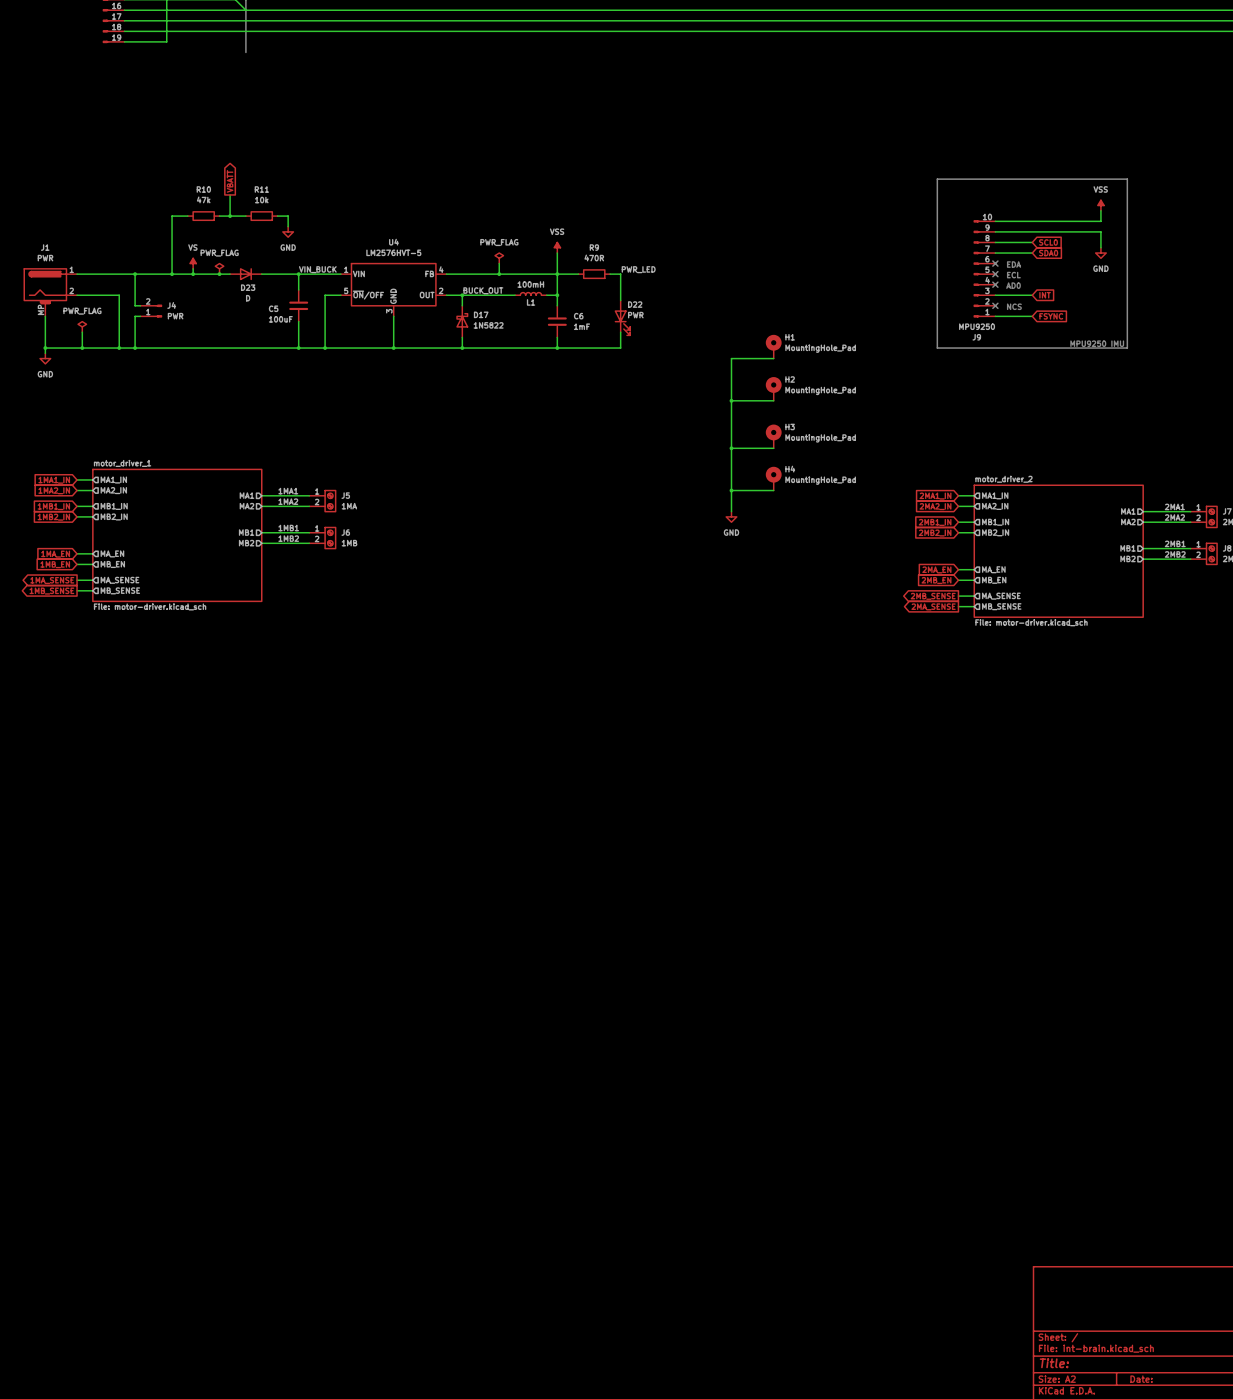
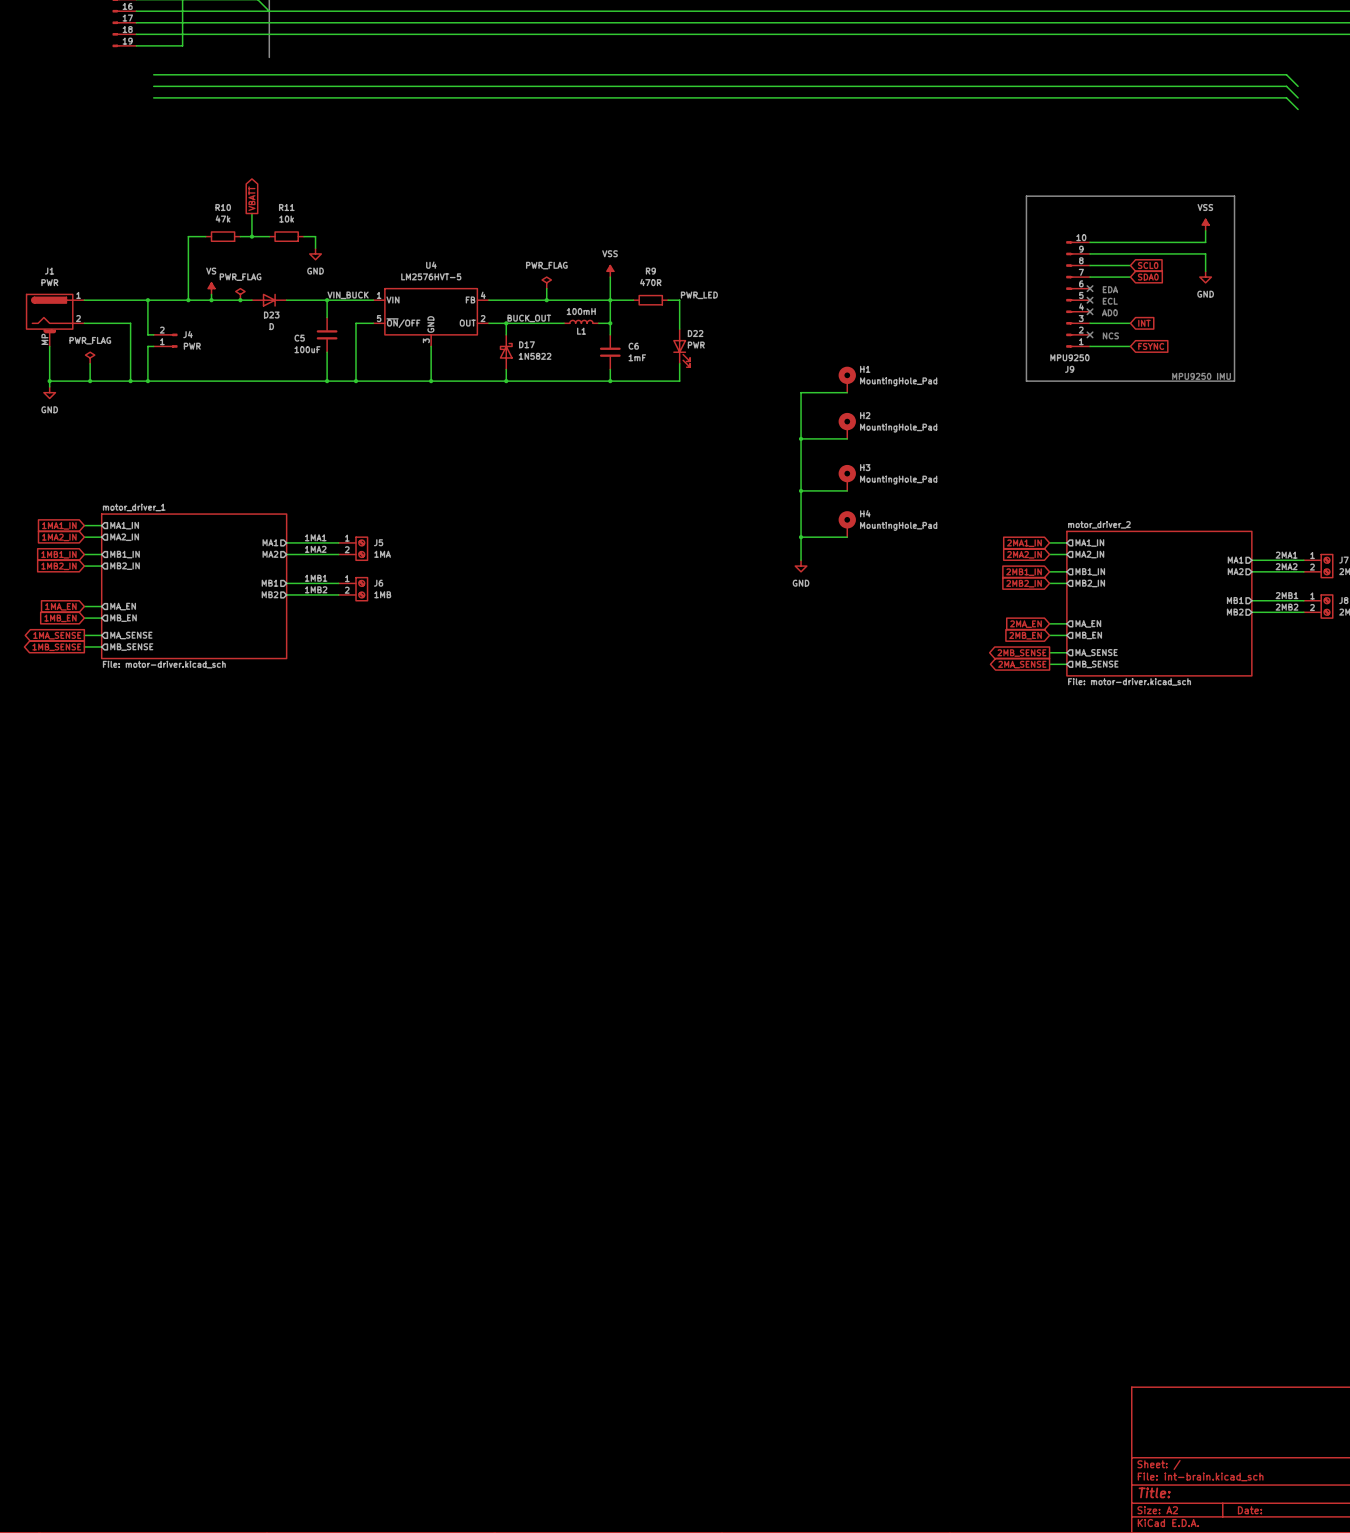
wire: none -> (153, 74) (1286, 74) (1298, 86)
wire: none -> (153, 86) (1286, 86) (1298, 97)
wire: none -> (153, 97) (1286, 97) (1298, 109)

